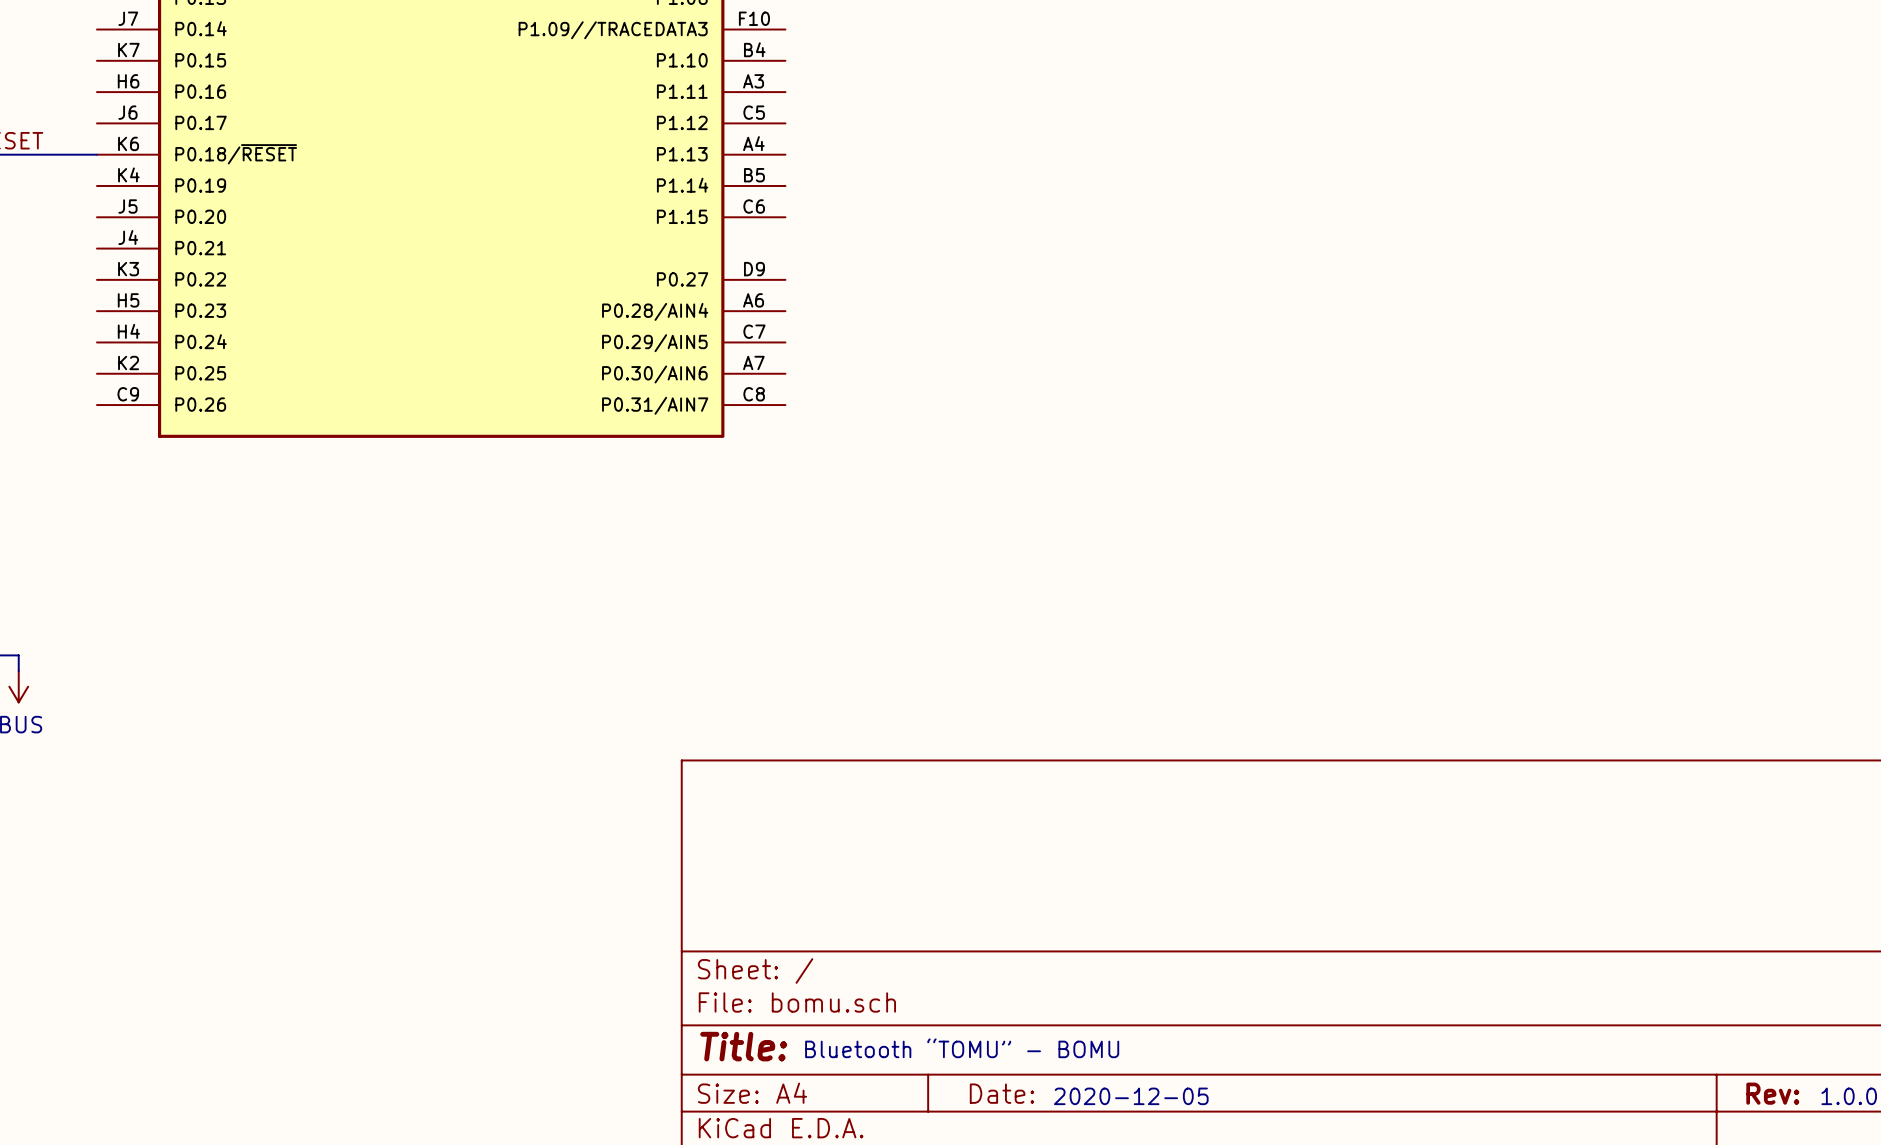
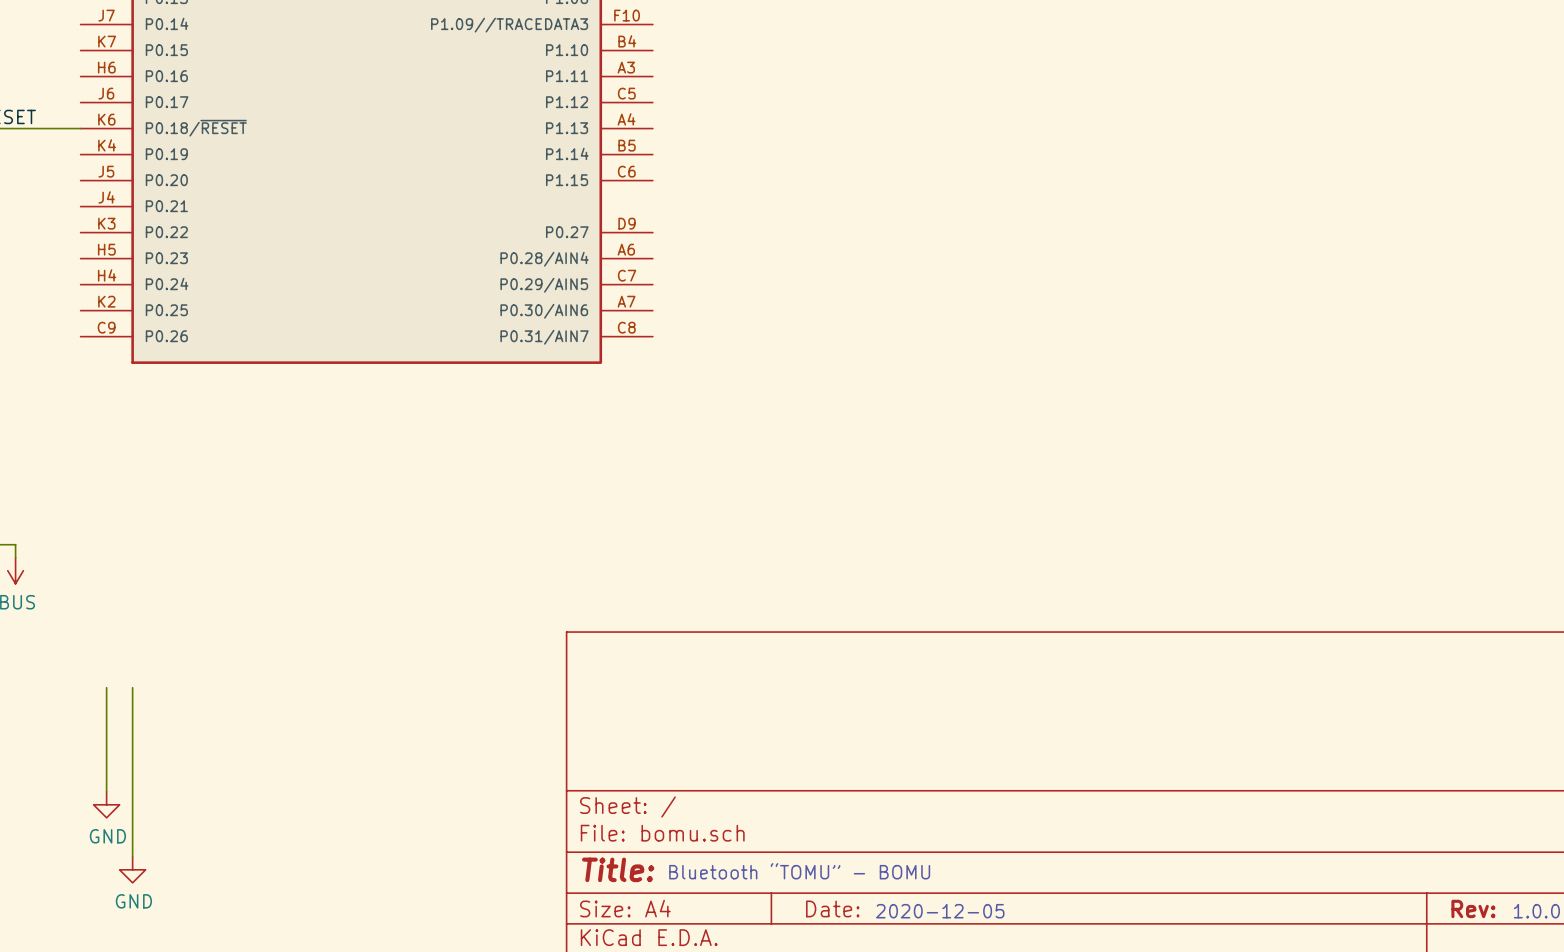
wire: none -> (106, 687) (106, 791)
wire: none -> (132, 687) (132, 856)
power symbol: none -> GND (106, 804)
power symbol: none -> GND (132, 869)

